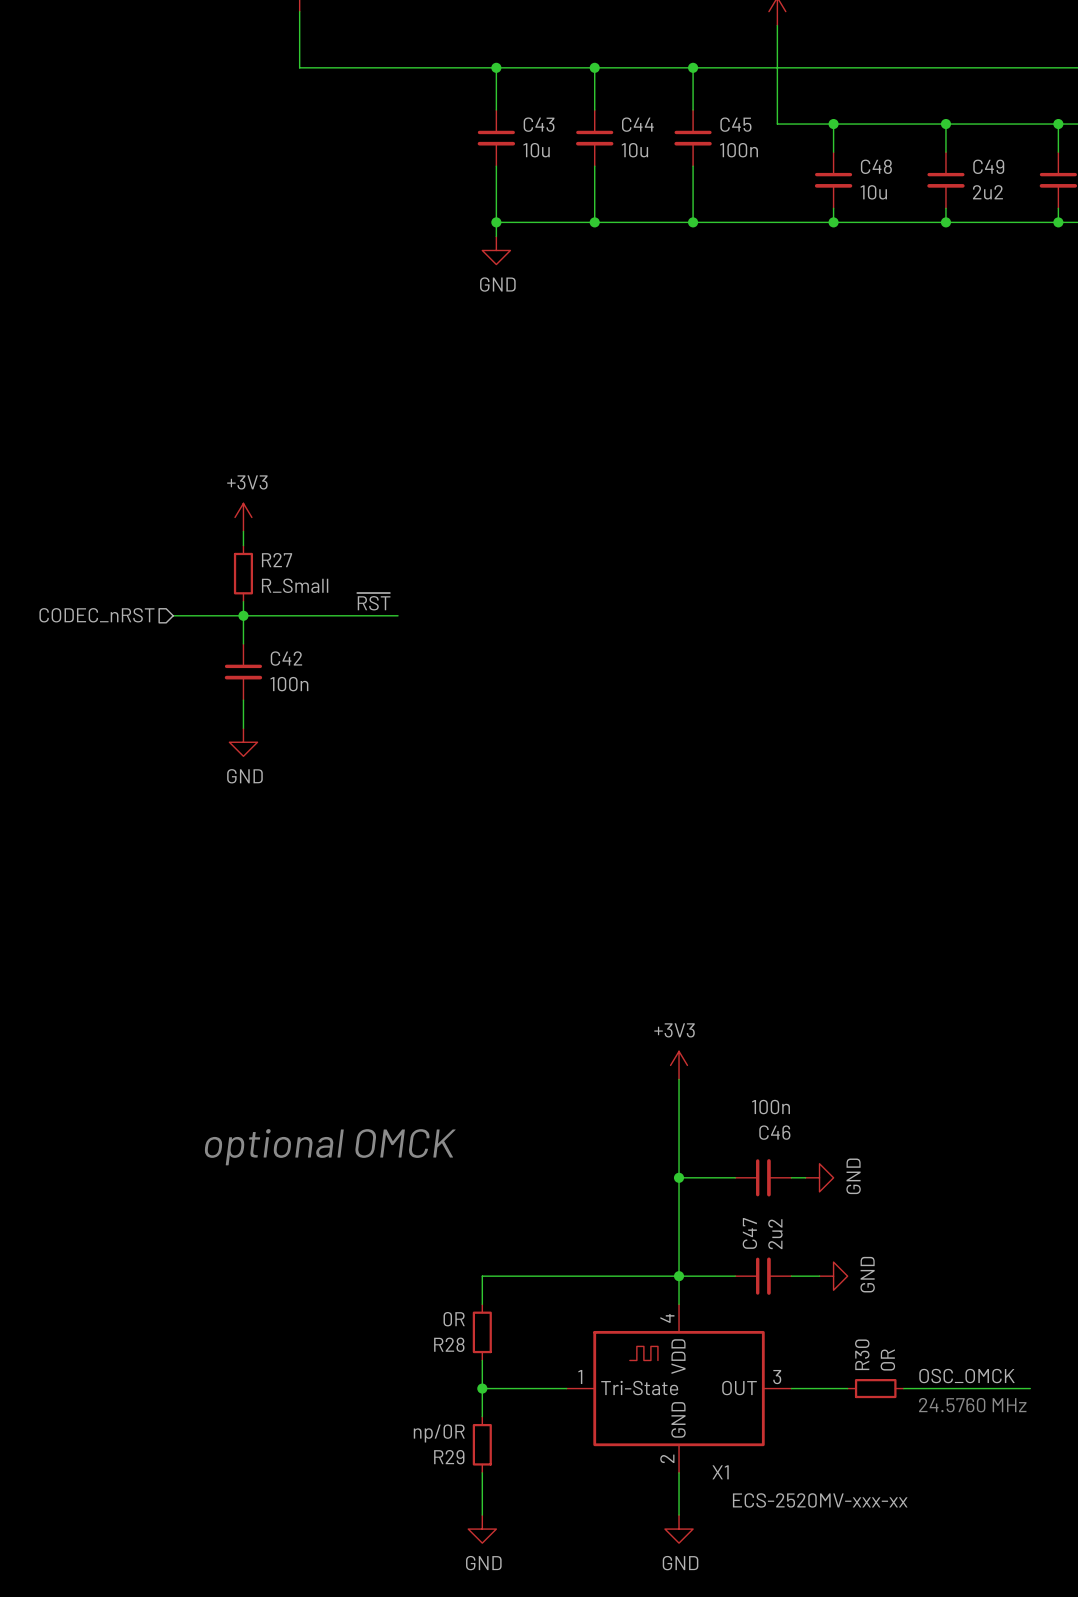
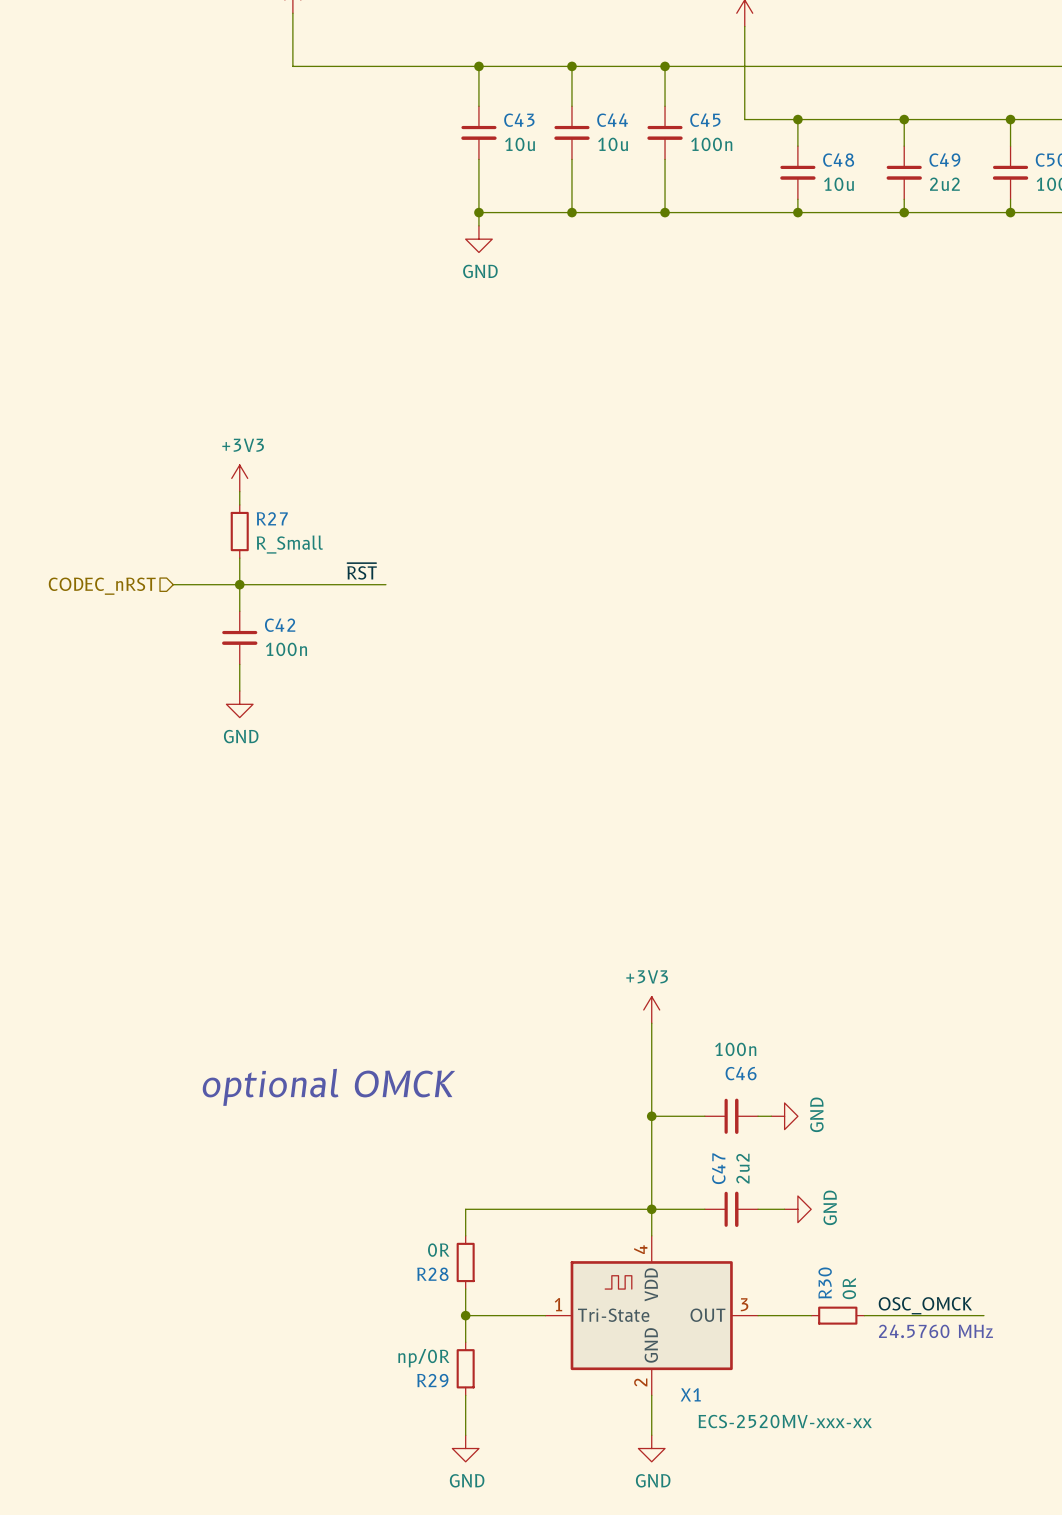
power symbol position: +3V3 (243, 517) -> +3V3 (239, 478)
R27 position: (243, 573) -> (239, 531)

